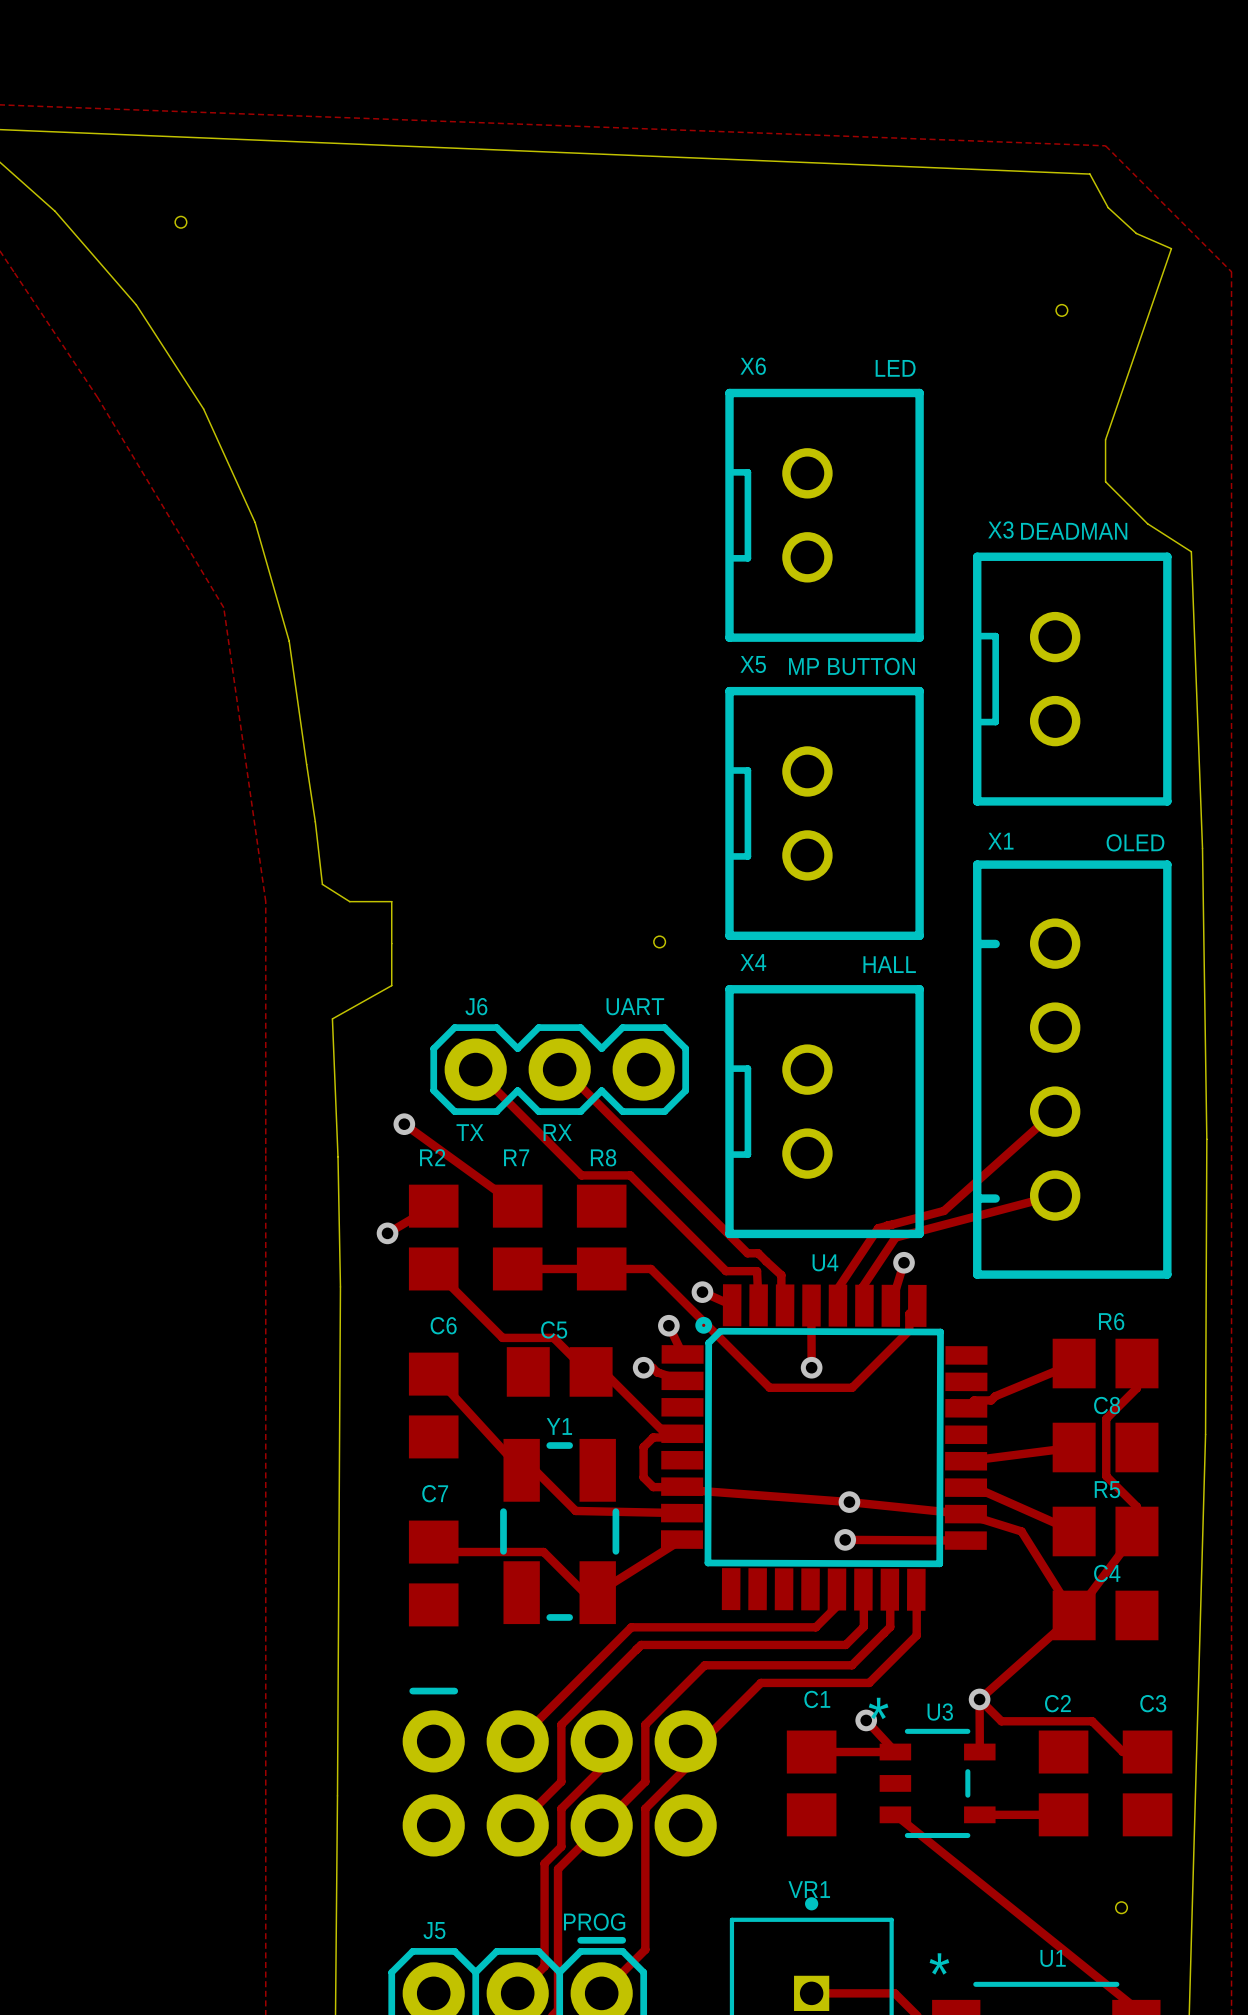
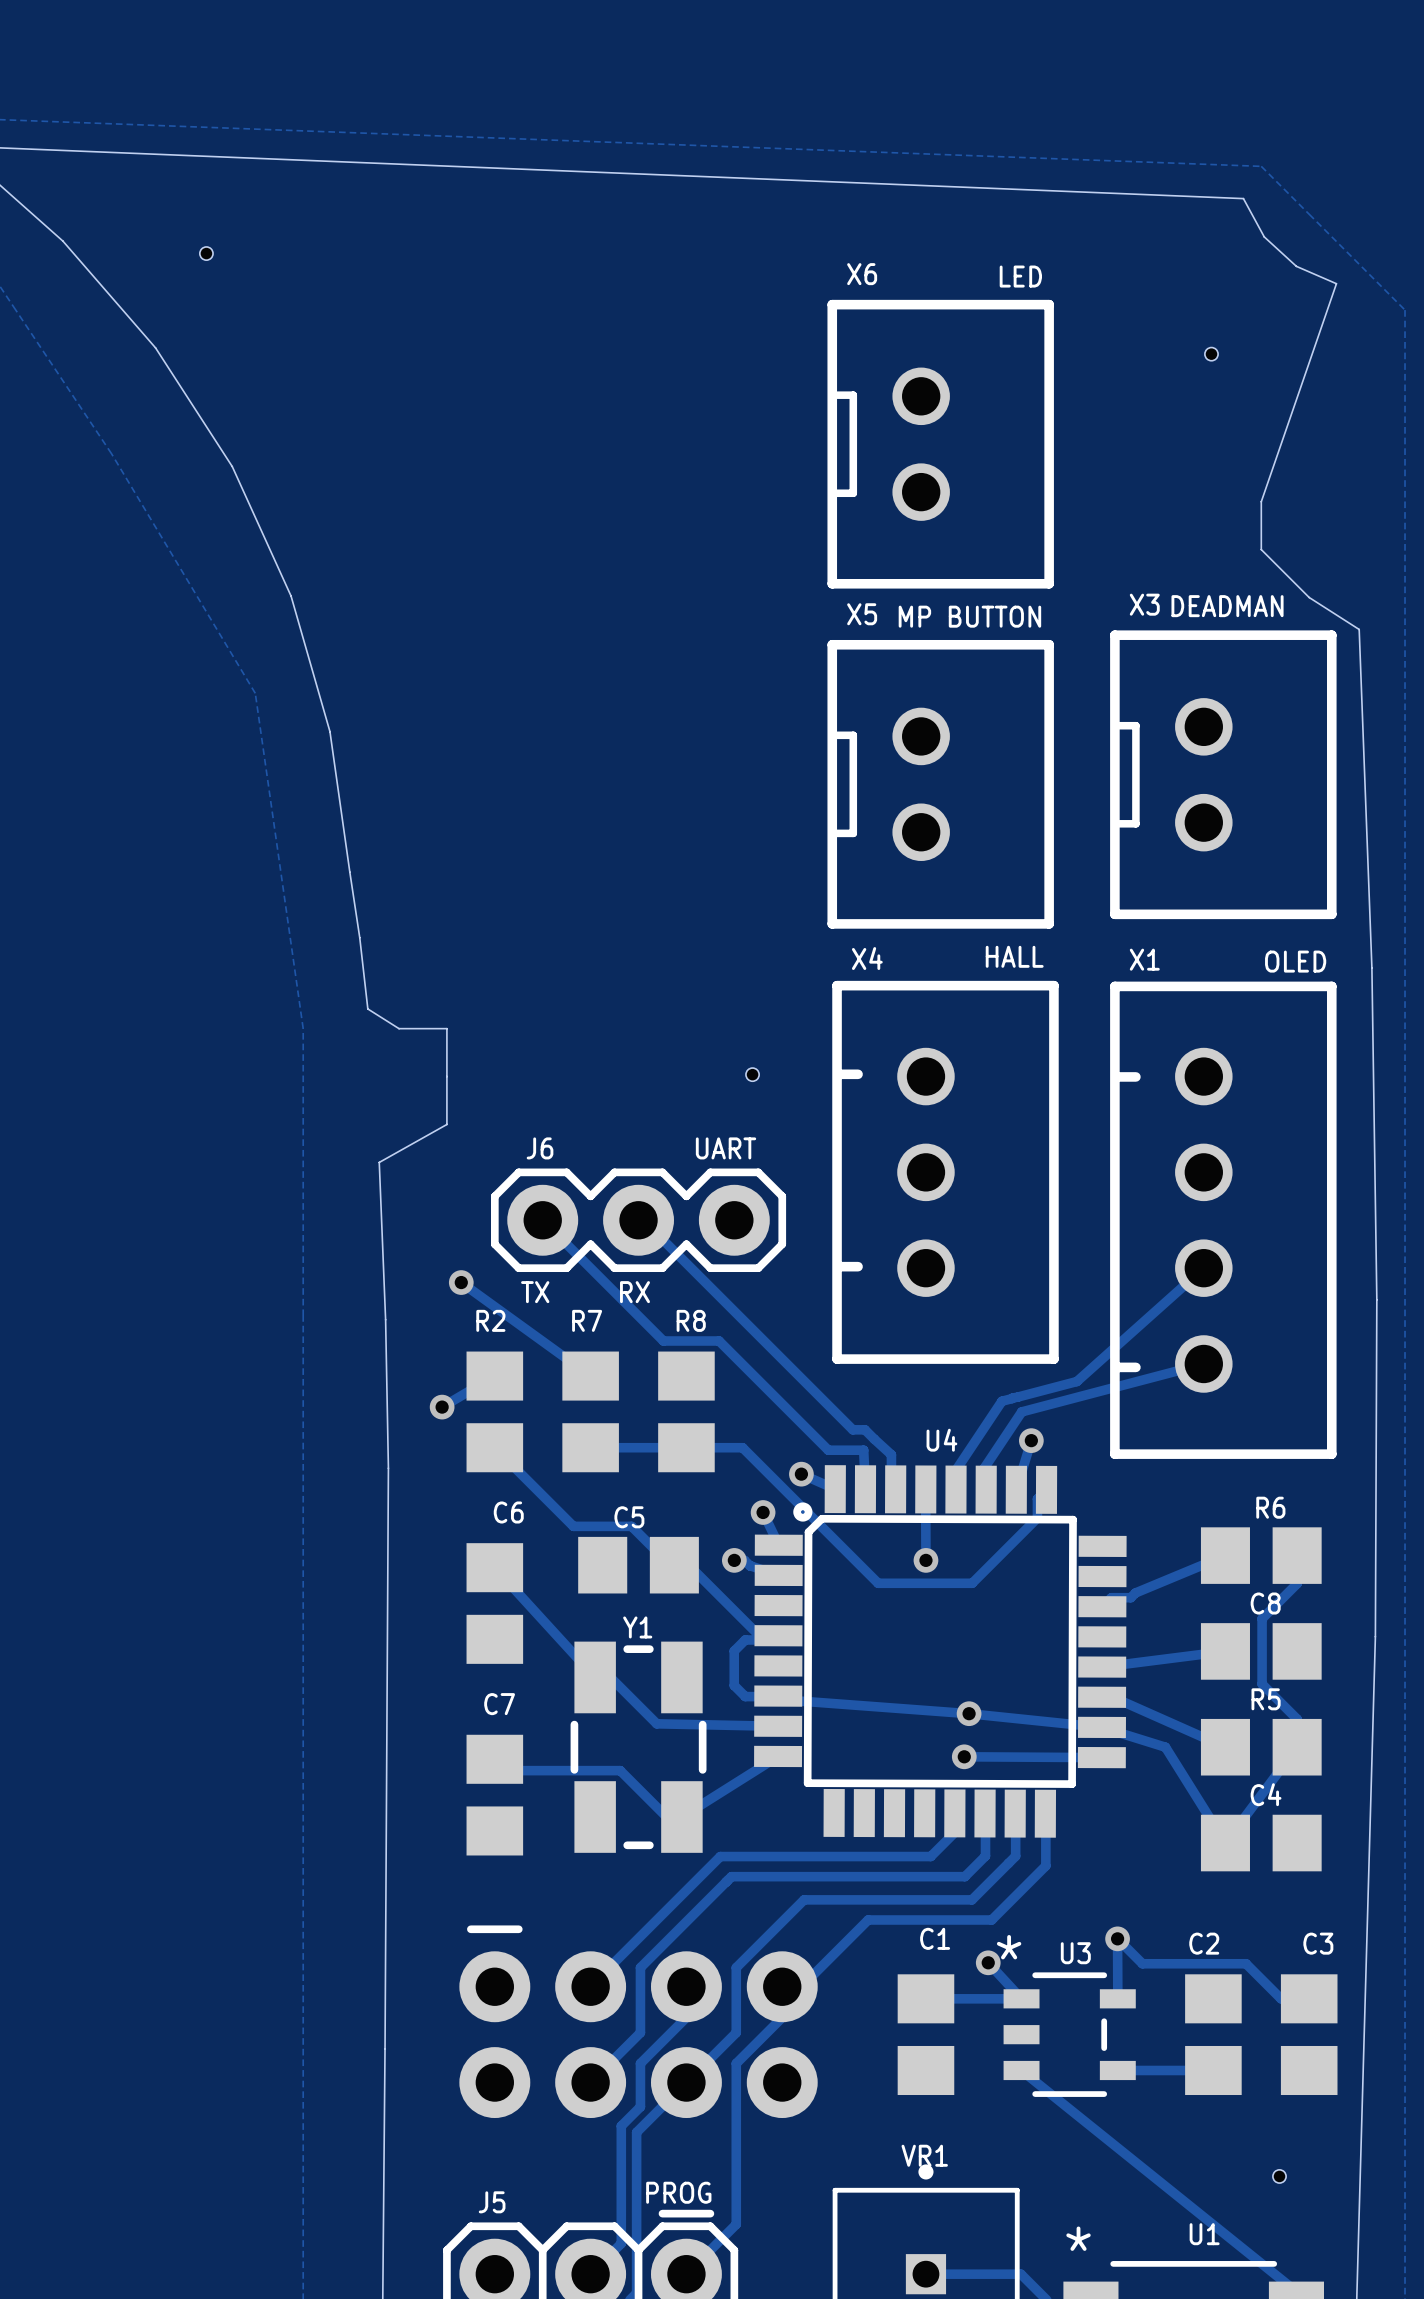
text position: LED (895, 368) -> LED (1020, 276)
X6 position: (824, 515) -> (940, 444)
text position: MP BUTTON (851, 666) -> MP BUTTON (969, 616)
X5 position: (824, 813) -> (940, 784)
text position: HALL (889, 964) -> HALL (1014, 956)
X4 footprint: [725, 985, 924, 1239] -> [832, 980, 1059, 1364]
track: (1074, 1615) (979, 1699) -> none

